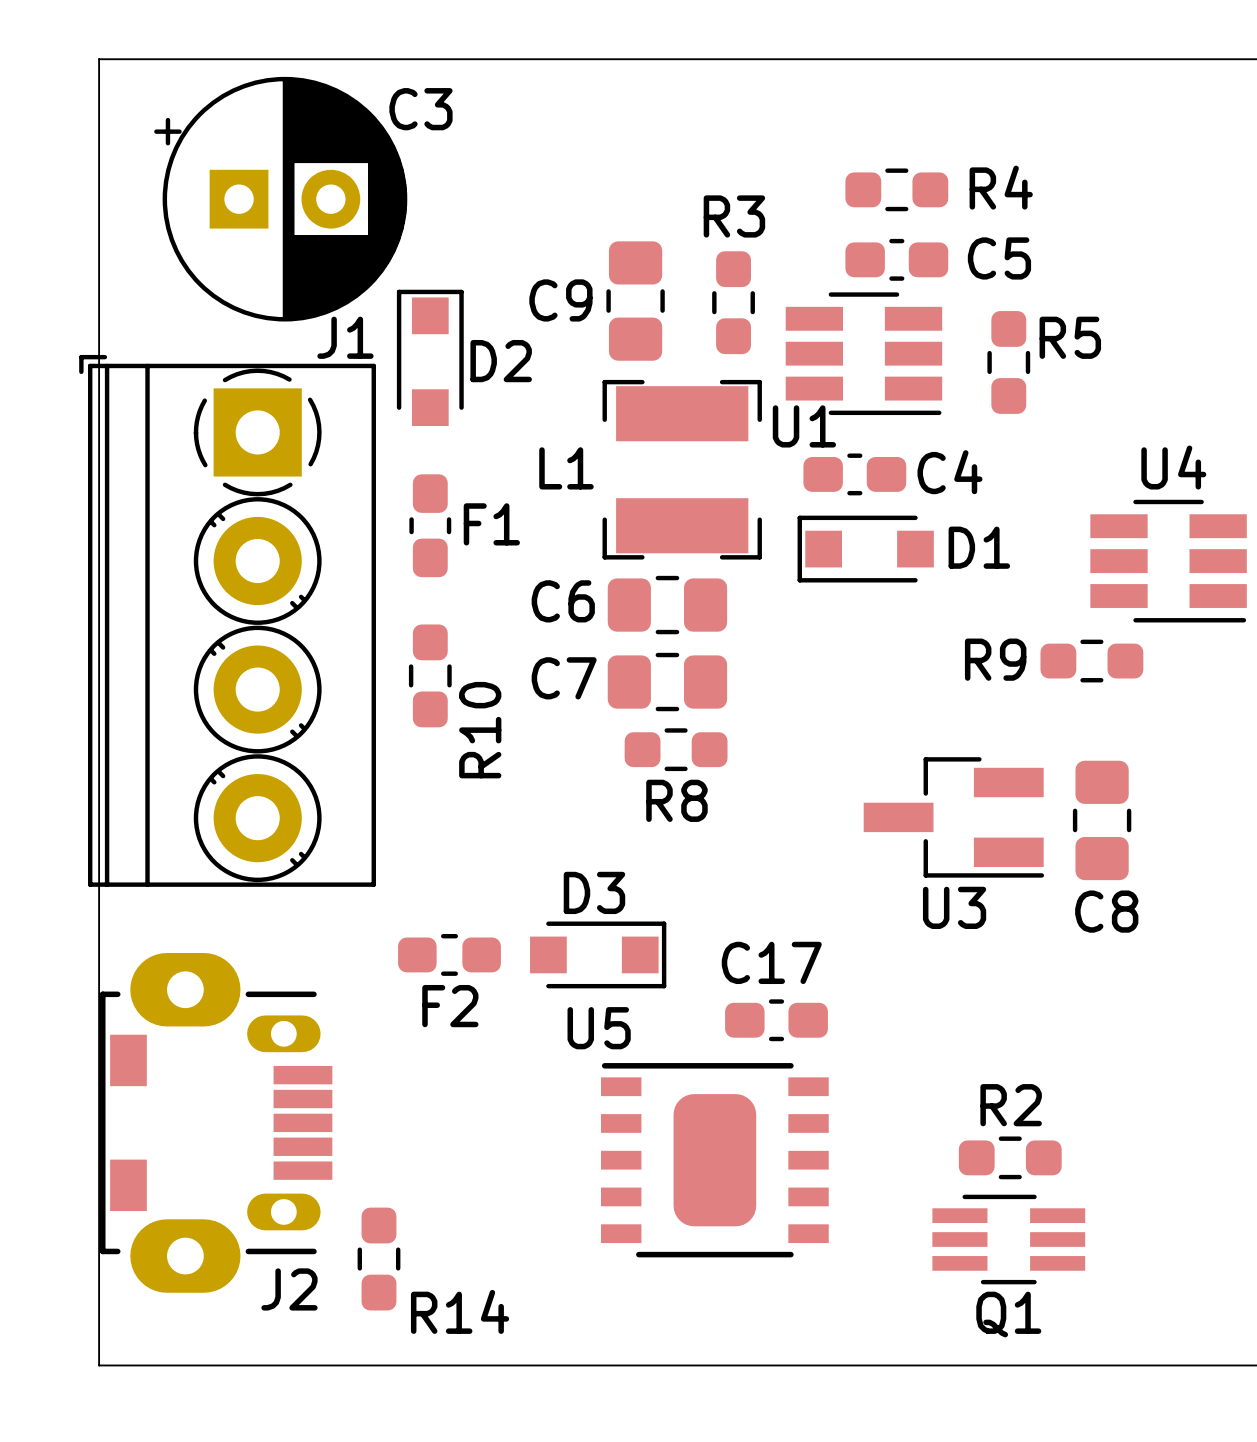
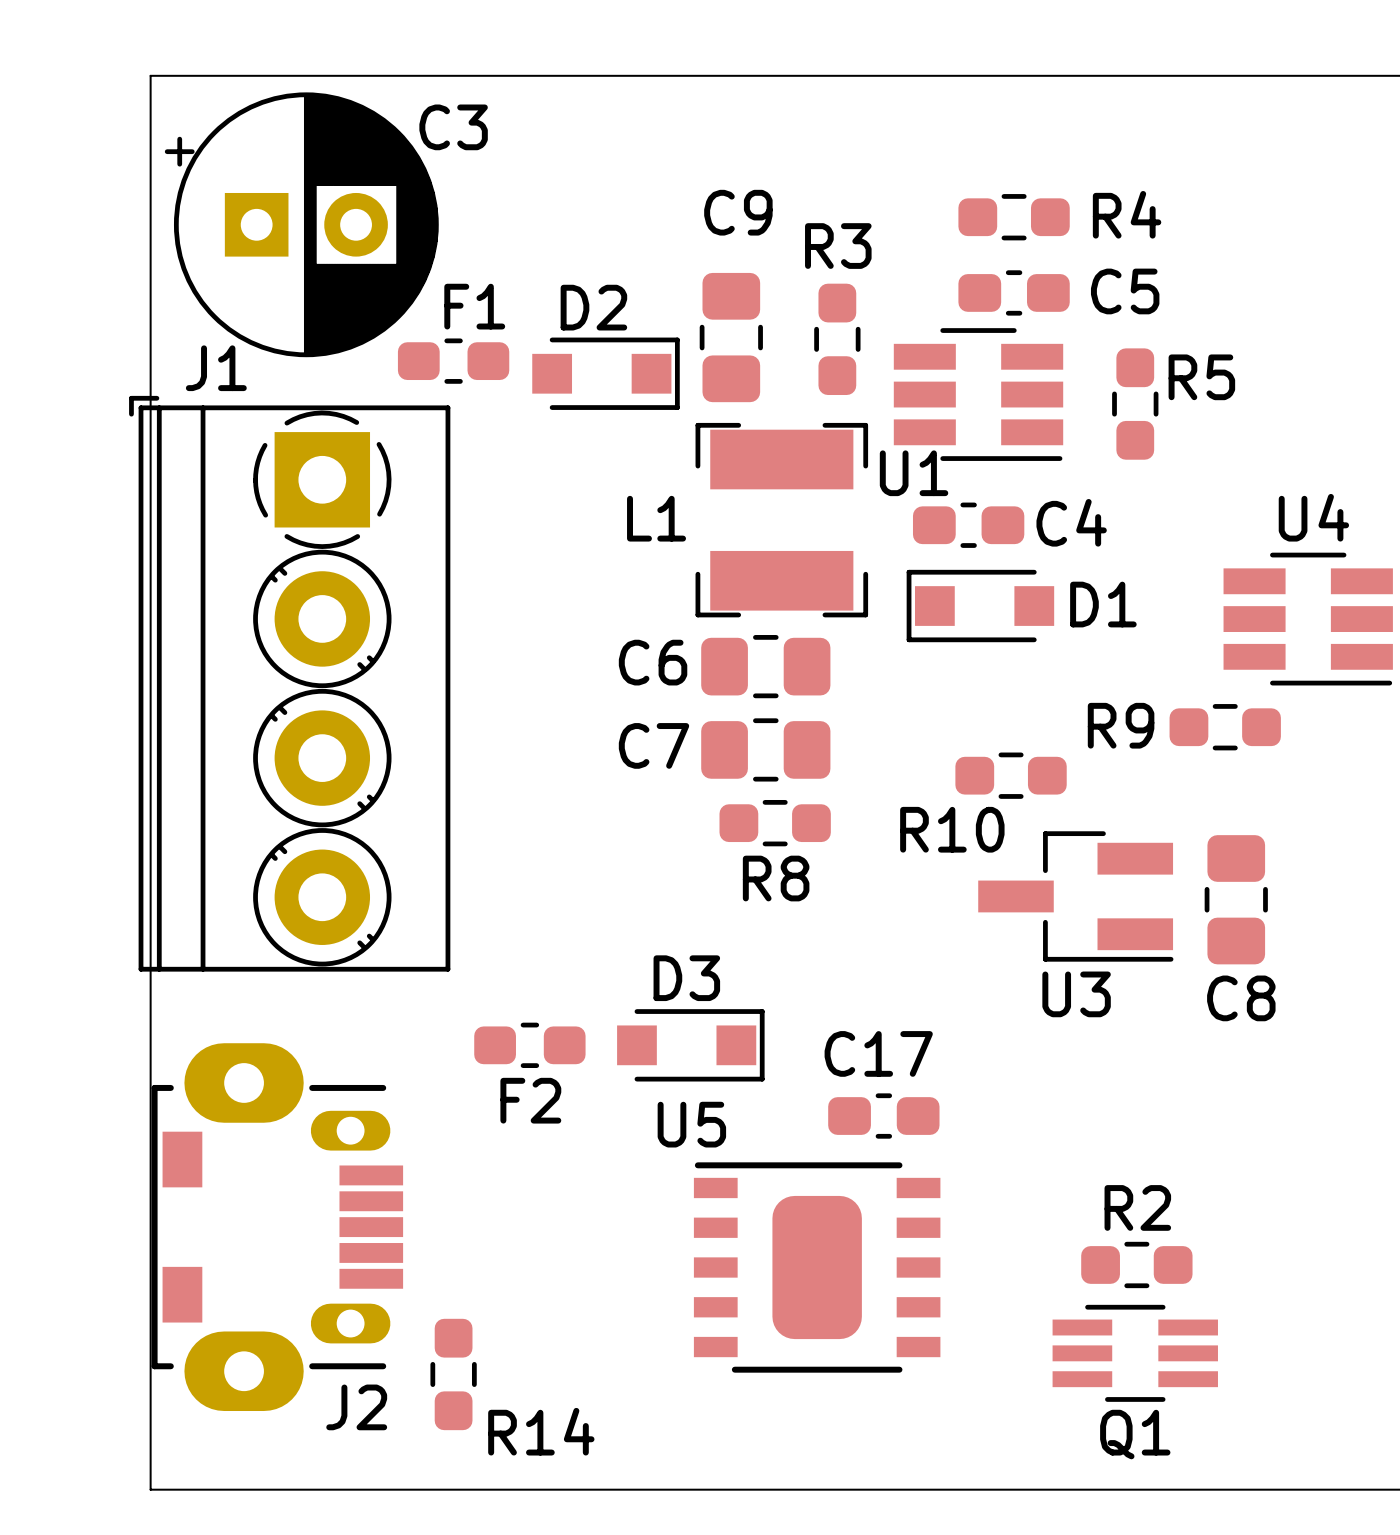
C3 position: (280, 199) -> (301, 224)
C9 name position: C9 (560, 300) -> C9 (738, 212)
J1 name position: J1 (345, 337) -> J1 (216, 368)
D2 rotation: 0° (430, 357) -> 90° clockwise (606, 373)
D2 position: (430, 357) -> (606, 373)
D2 name position: D2 (501, 361) -> D2 (593, 307)
F1 rotation: 0° (430, 525) -> 90° clockwise (453, 361)
F1 position: (430, 525) -> (453, 361)
R10 rotation: 0° (430, 675) -> 90° clockwise (1011, 775)
R10 position: (430, 675) -> (1011, 775)

